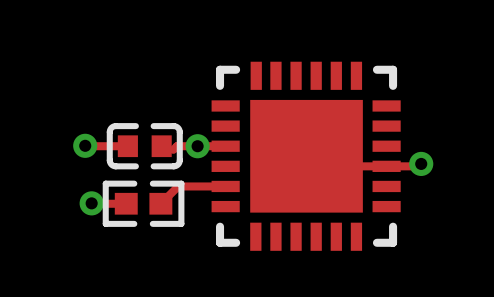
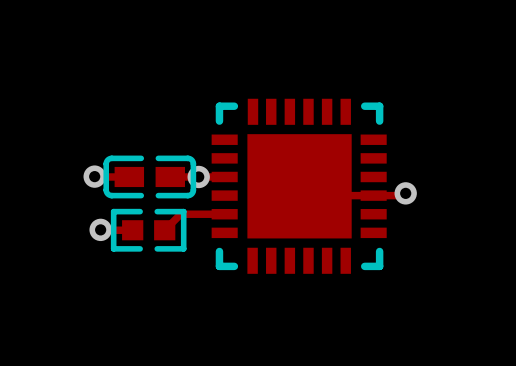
part footprint: [106, 123, 183, 170] -> [103, 155, 197, 199]

